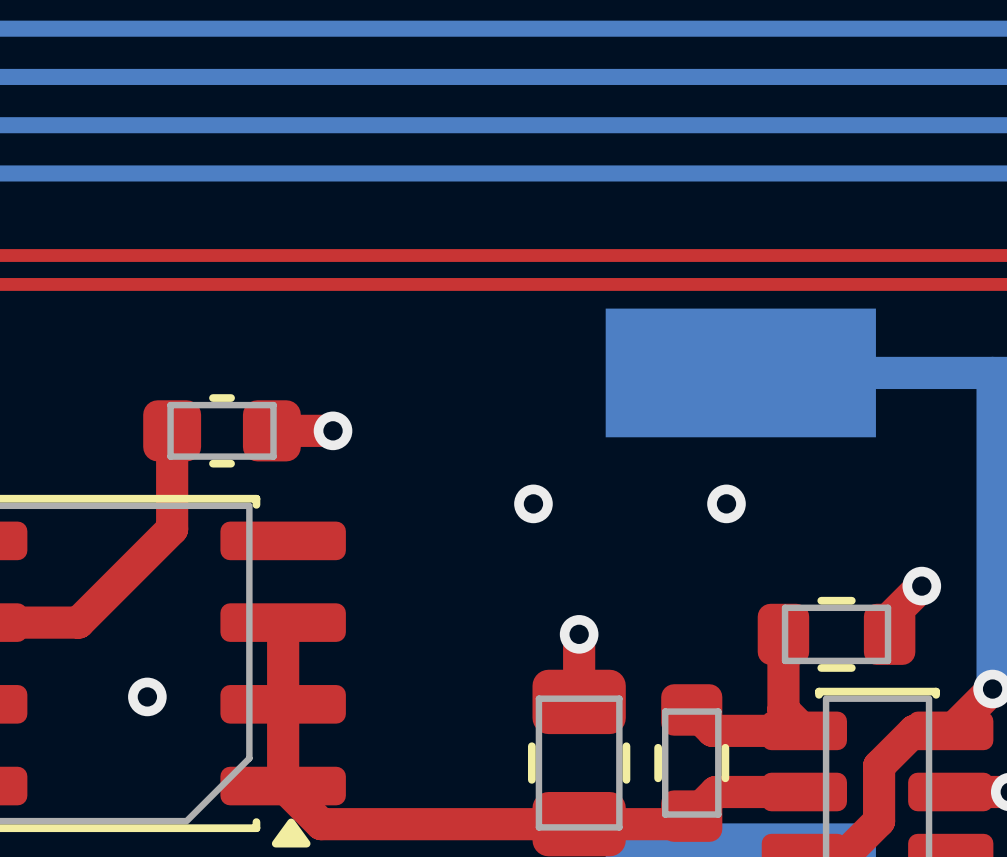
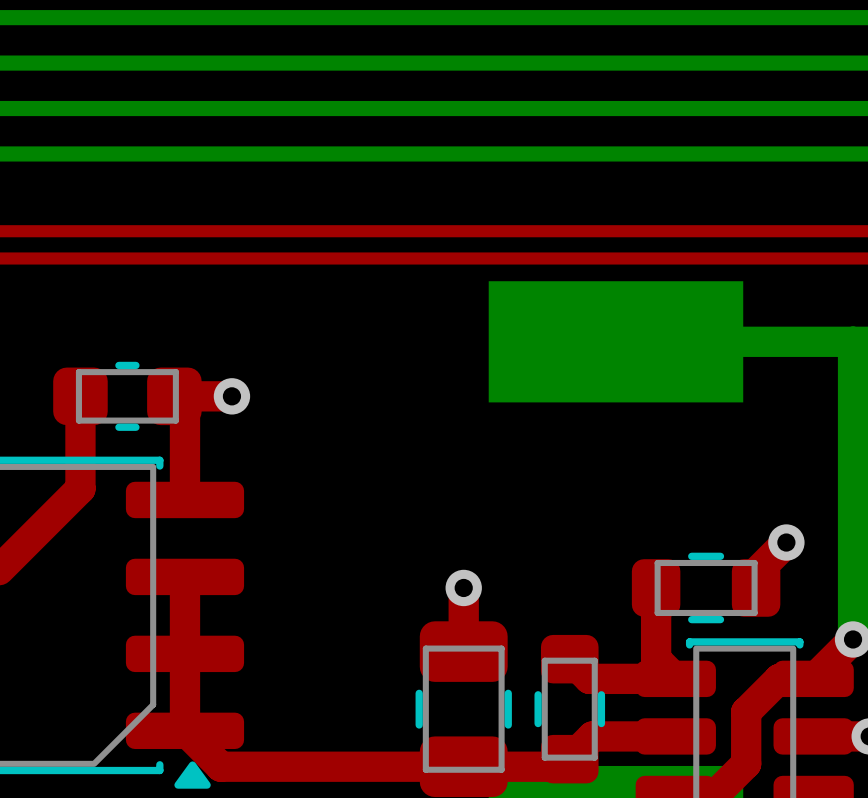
top track: none -> (184, 400) (184, 499)
via: (533, 503) -> none
via: (726, 503) -> none
via: (147, 696) -> none

